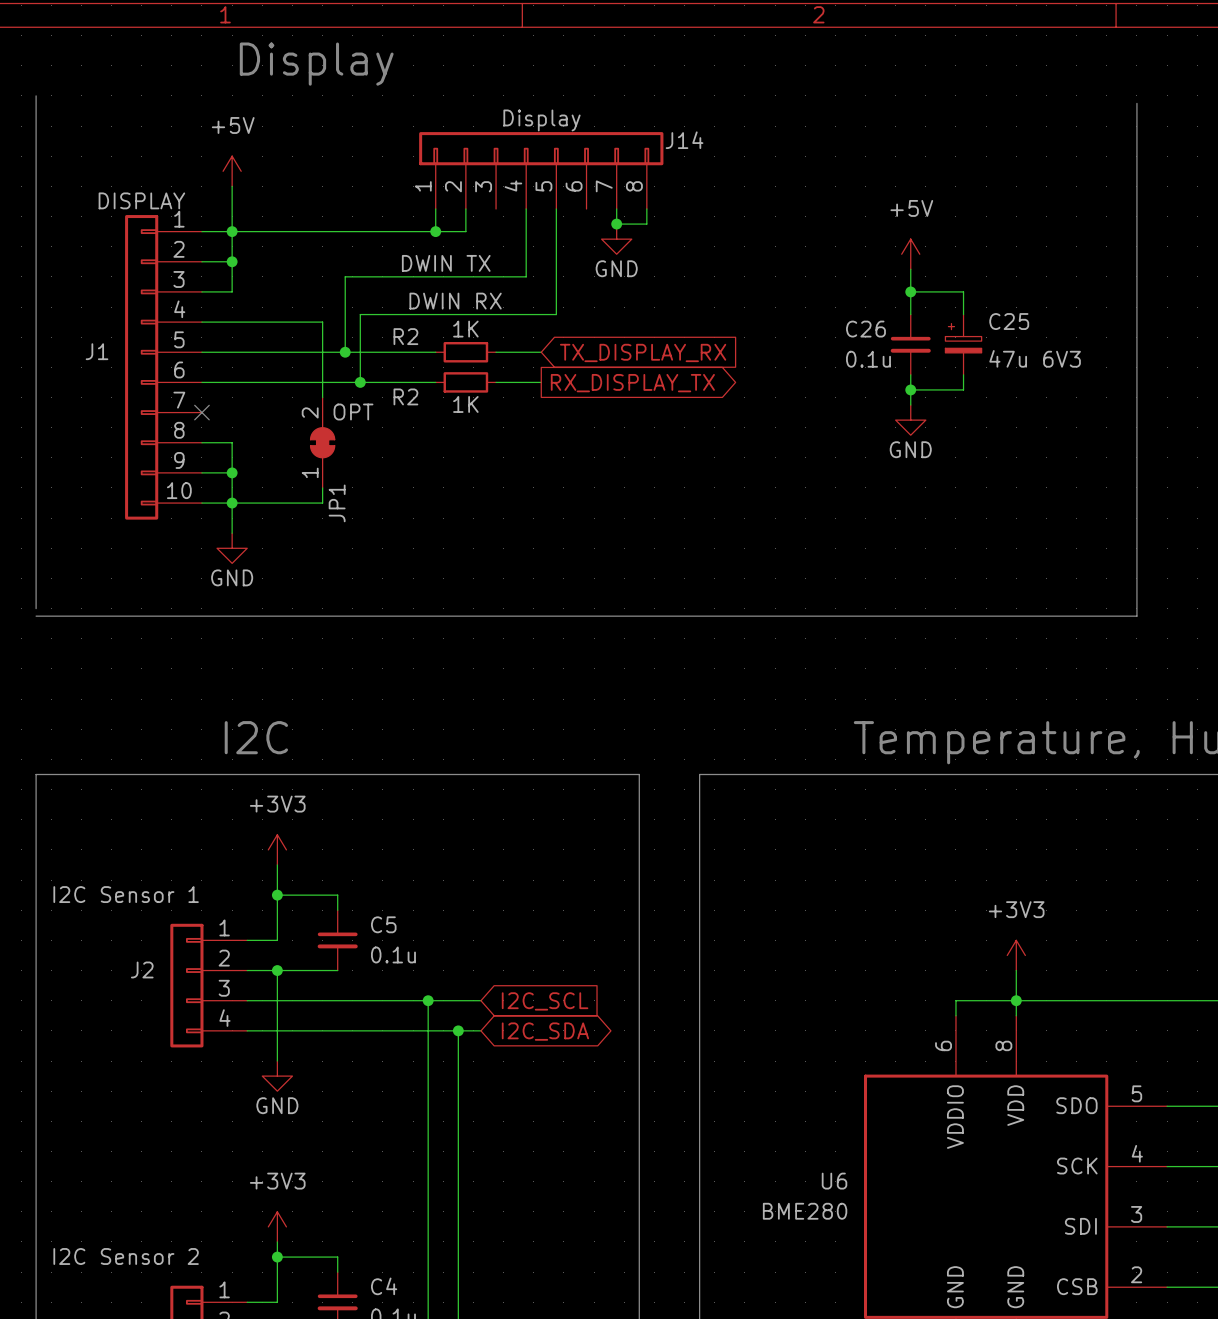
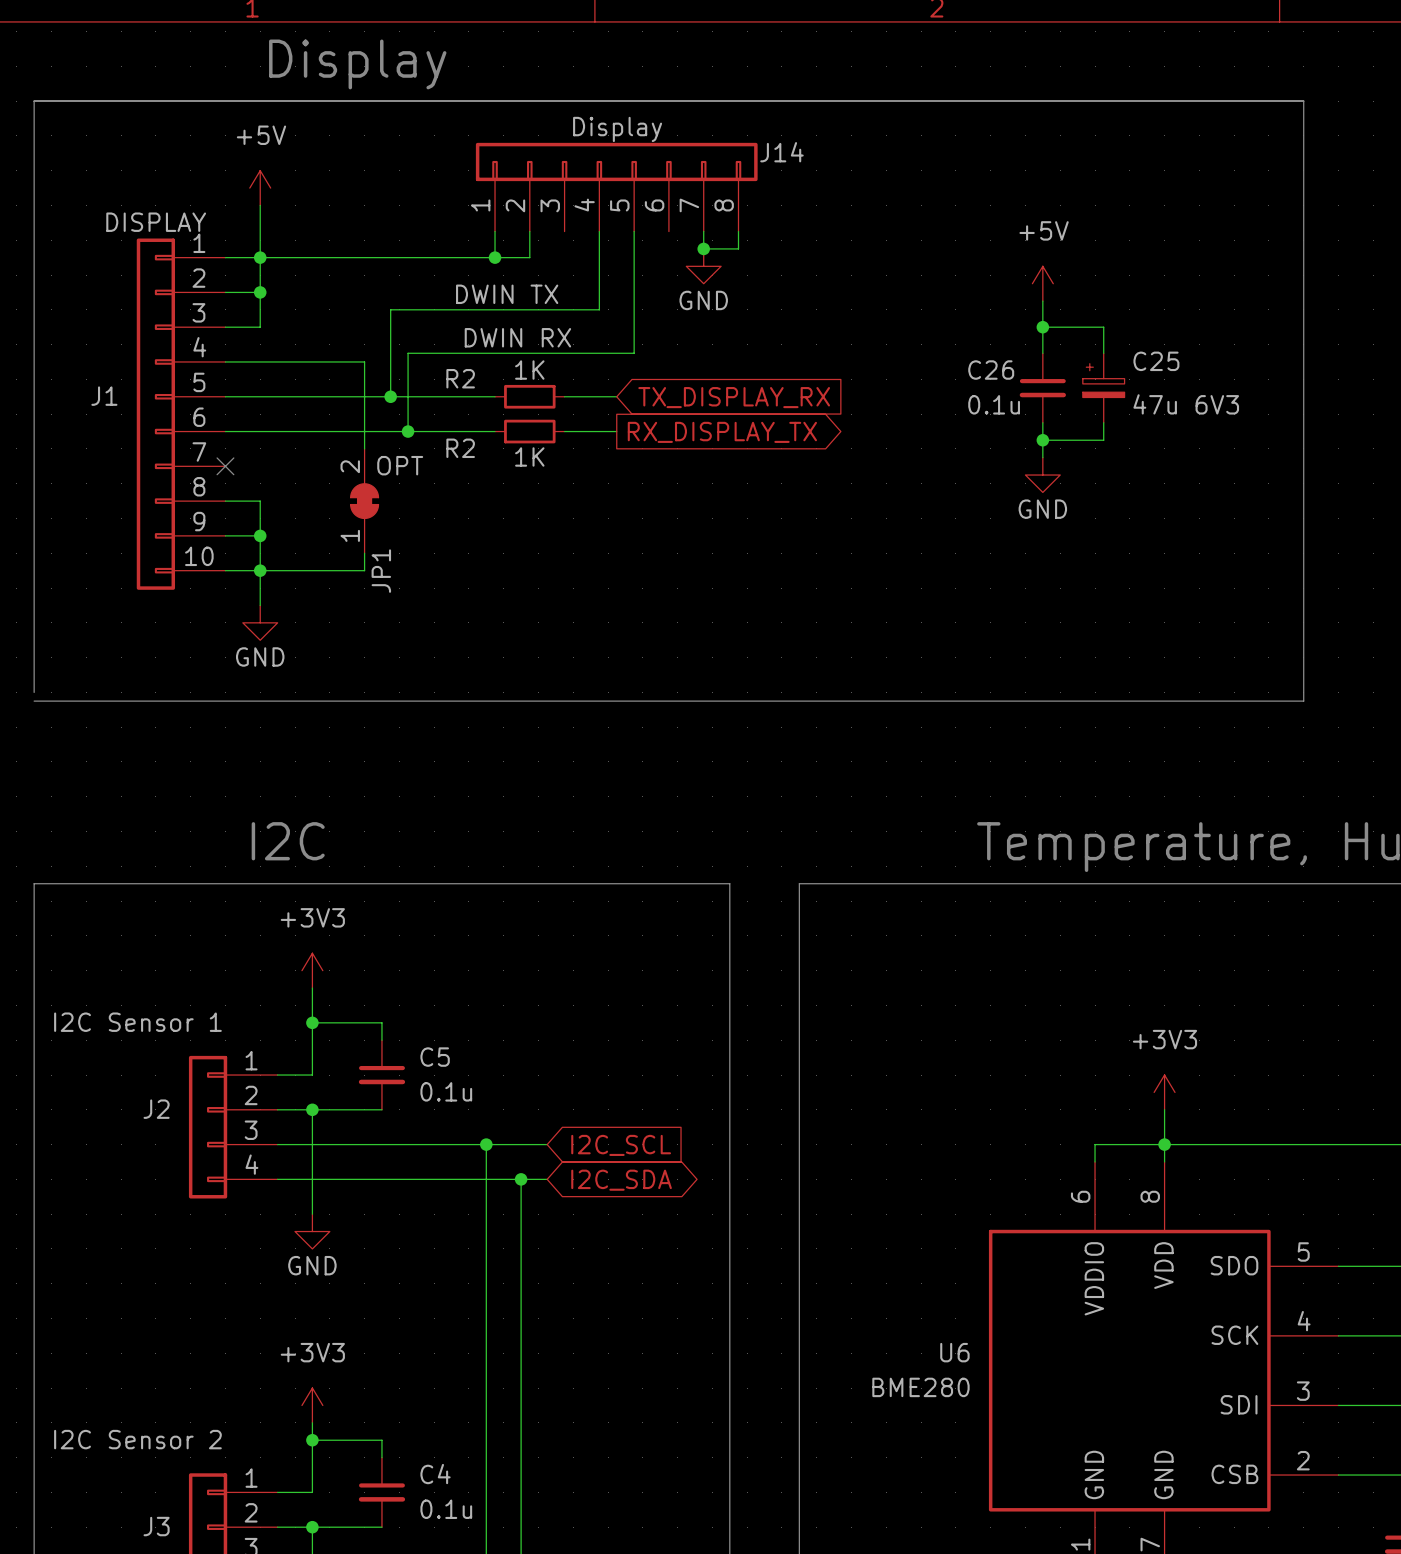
line: none -> (34, 101) (1303, 101) (1303, 109)

